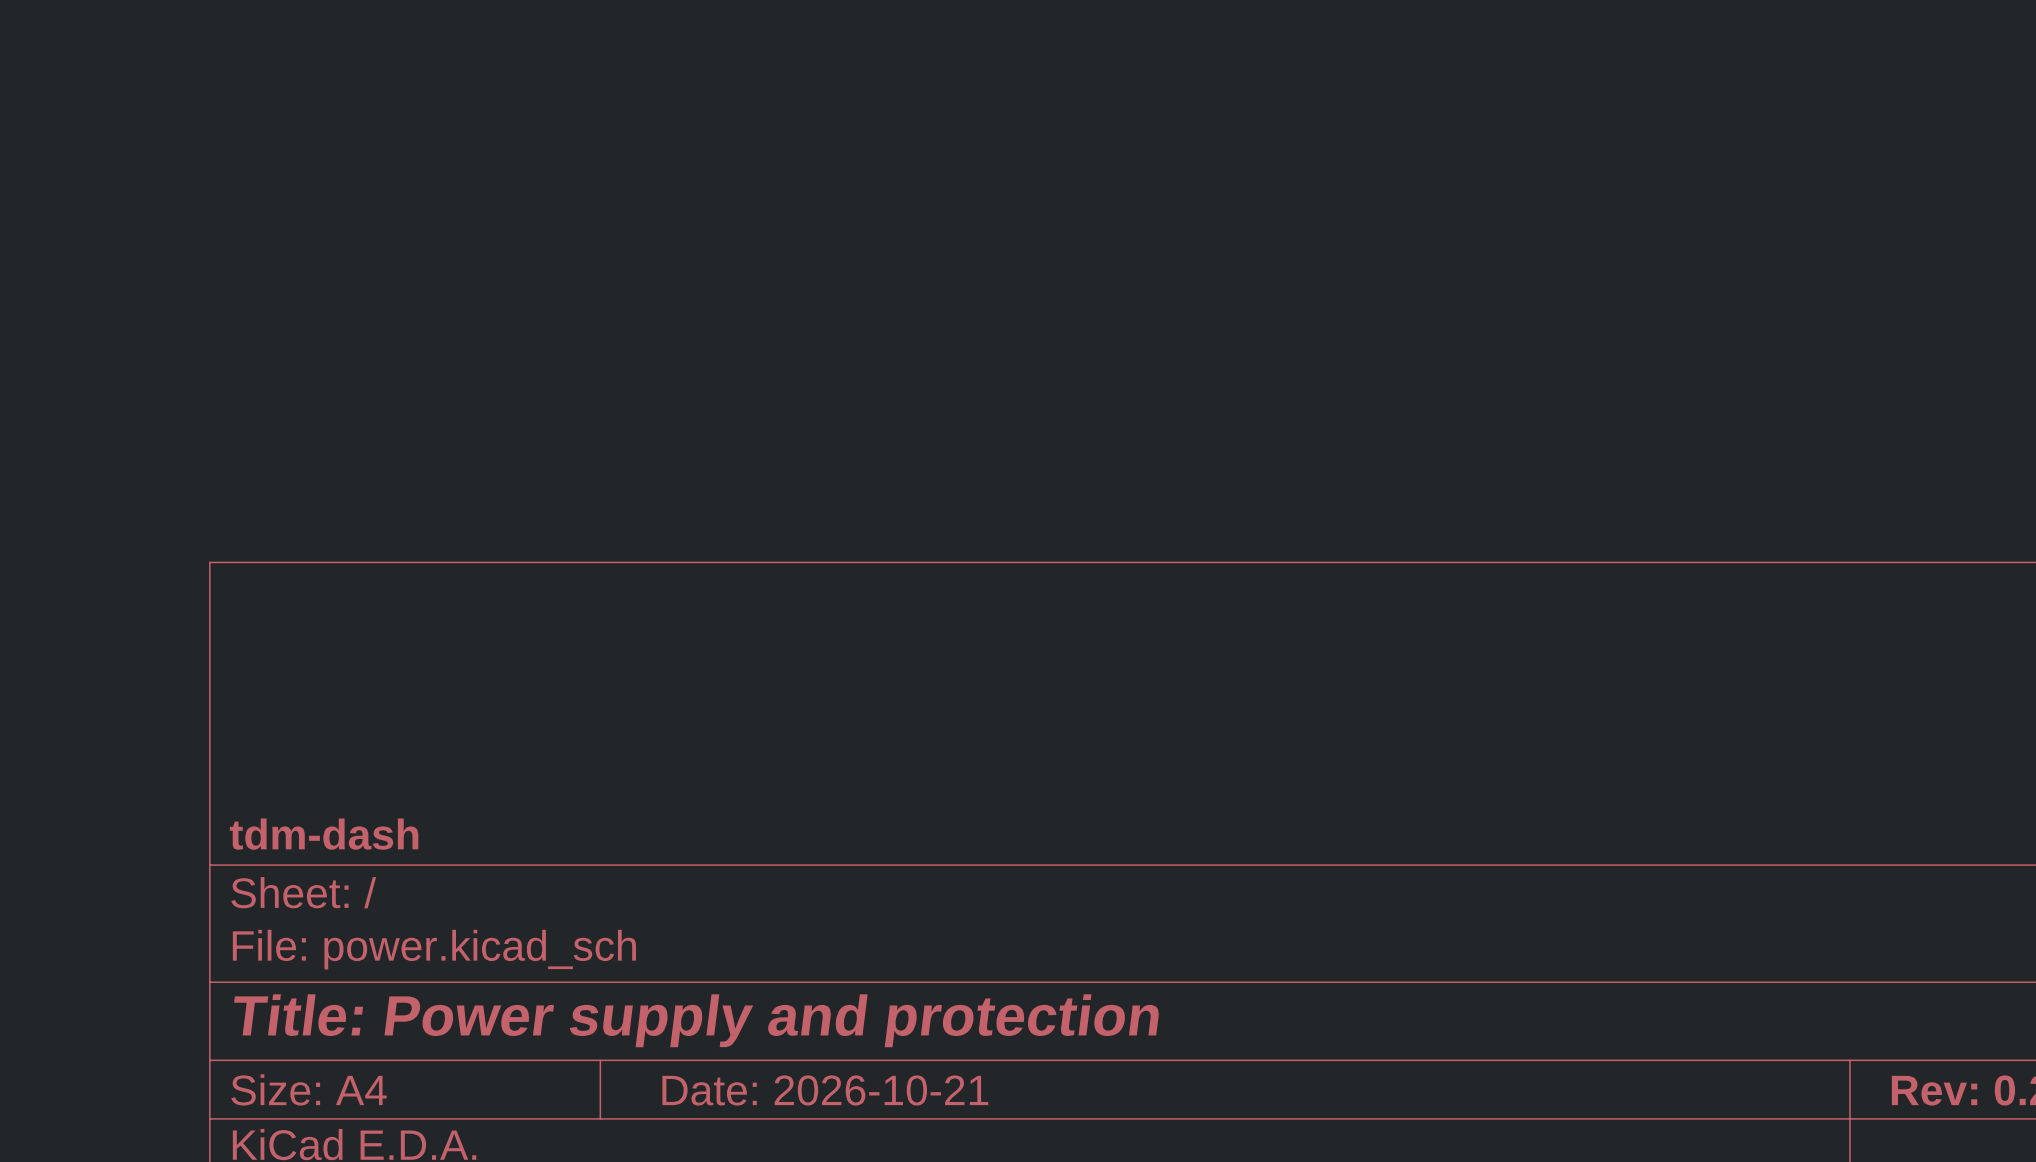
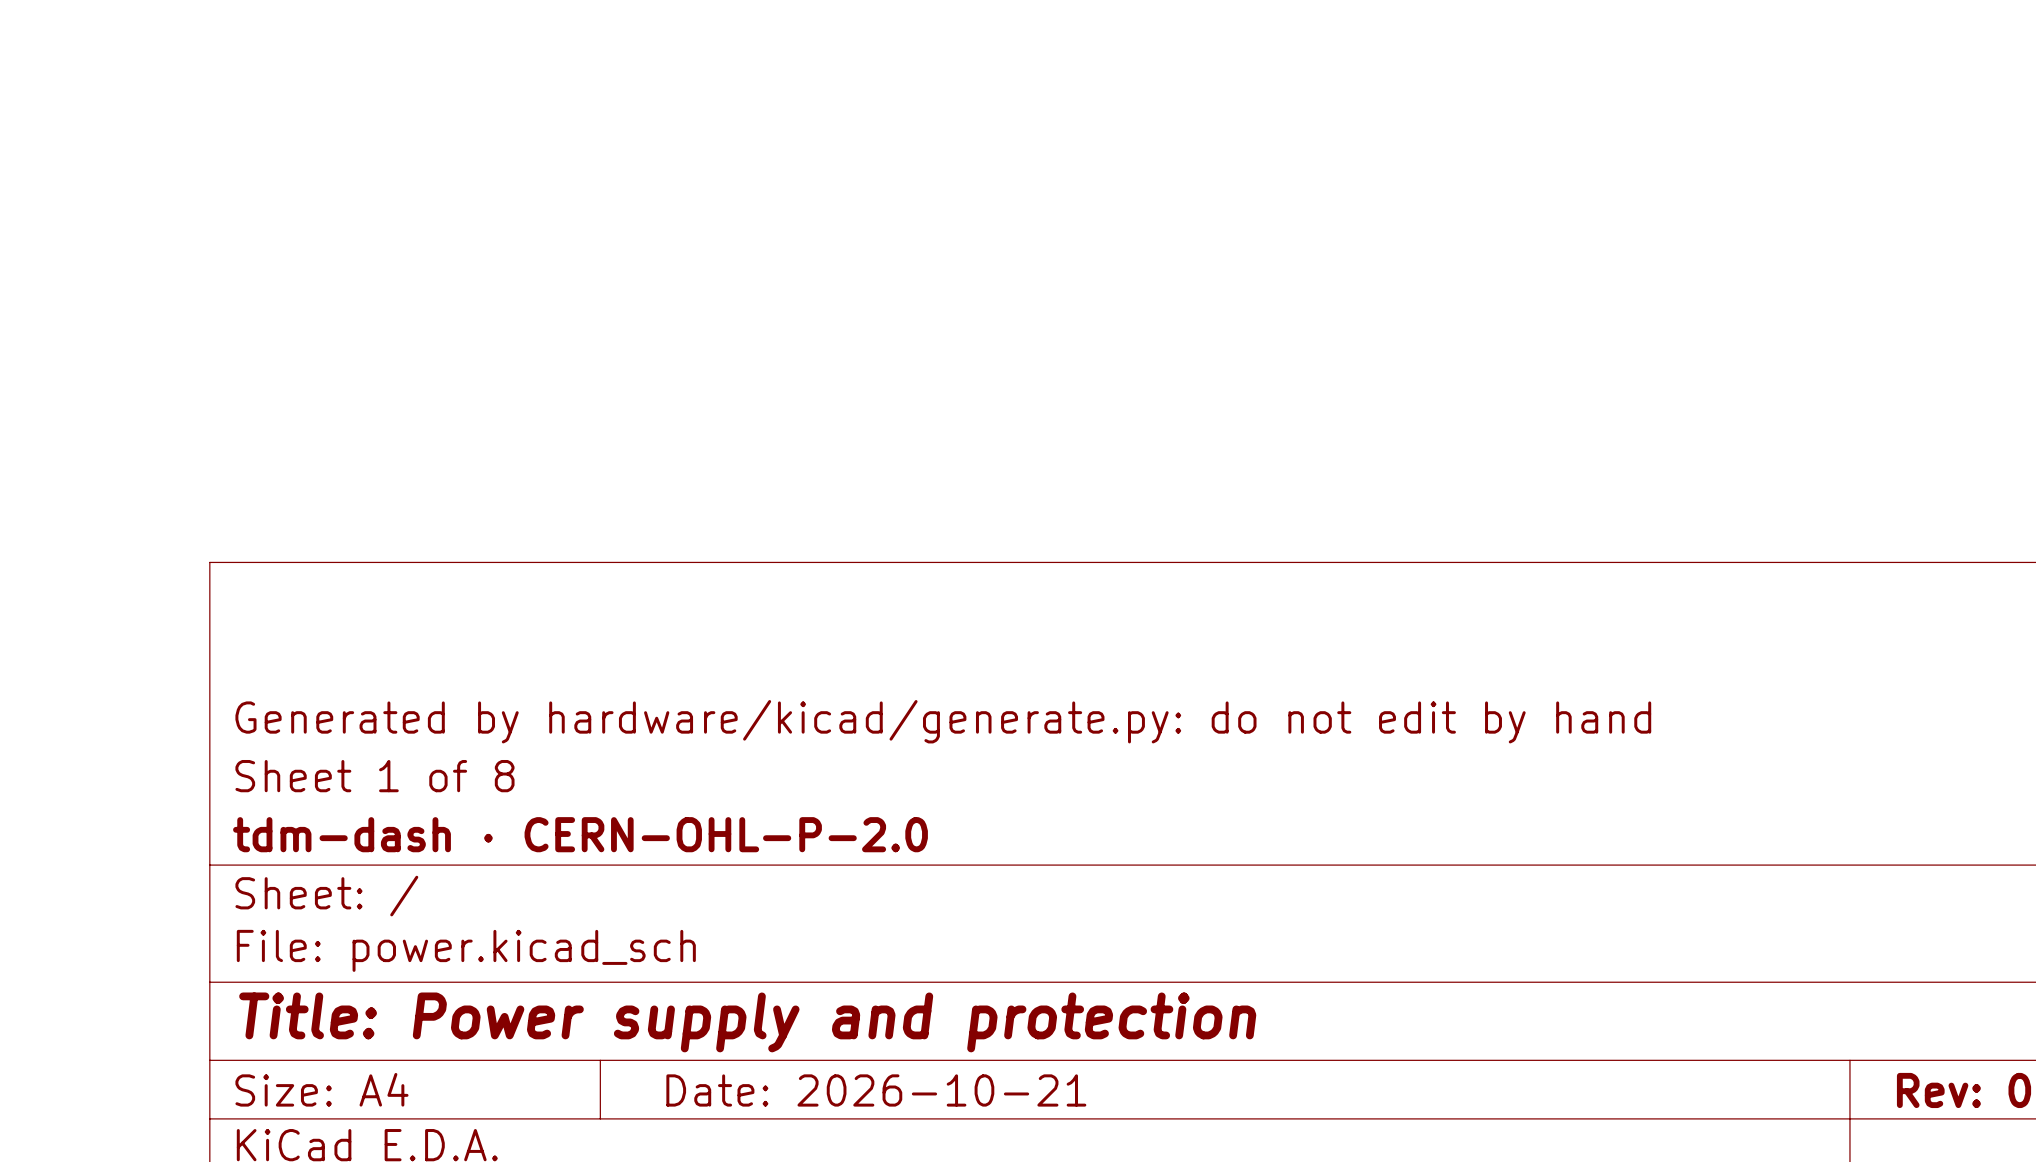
title block: none -> Generated by hardware/kicad/generate.py: do not edit by hand (943, 721)
title block: none -> Sheet 1 of 8 (374, 776)
title block: tdm-dash (324, 834) -> tdm-dash · CERN-OHL-P-2.0 (580, 834)

